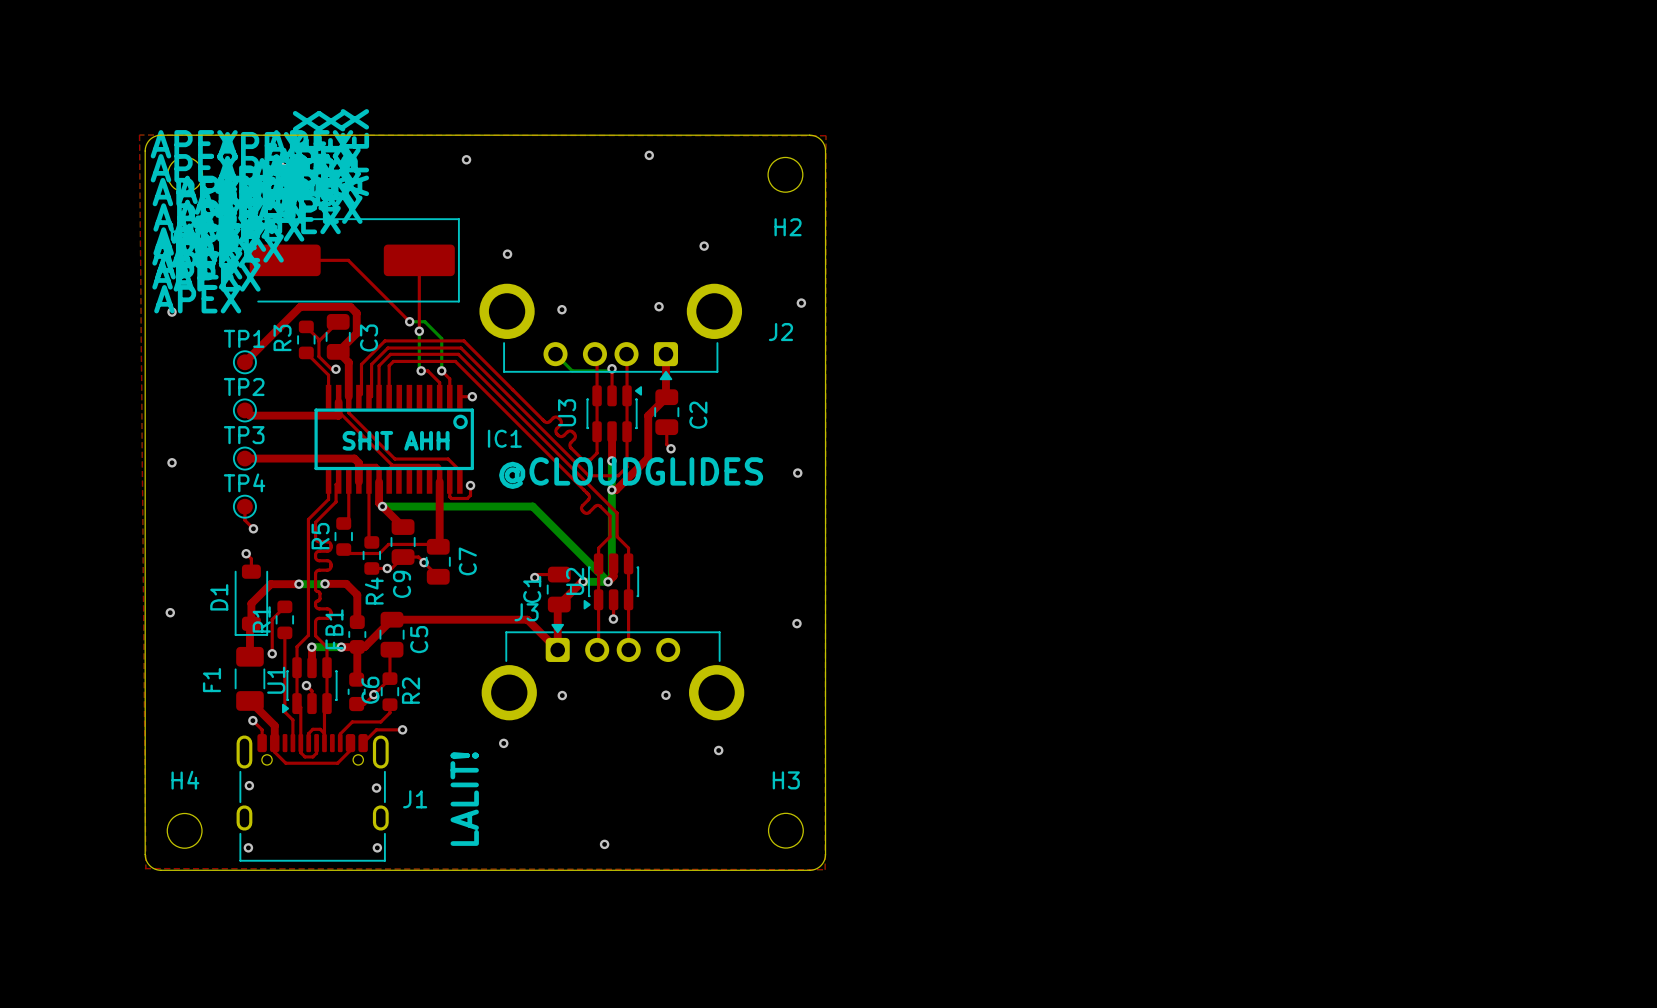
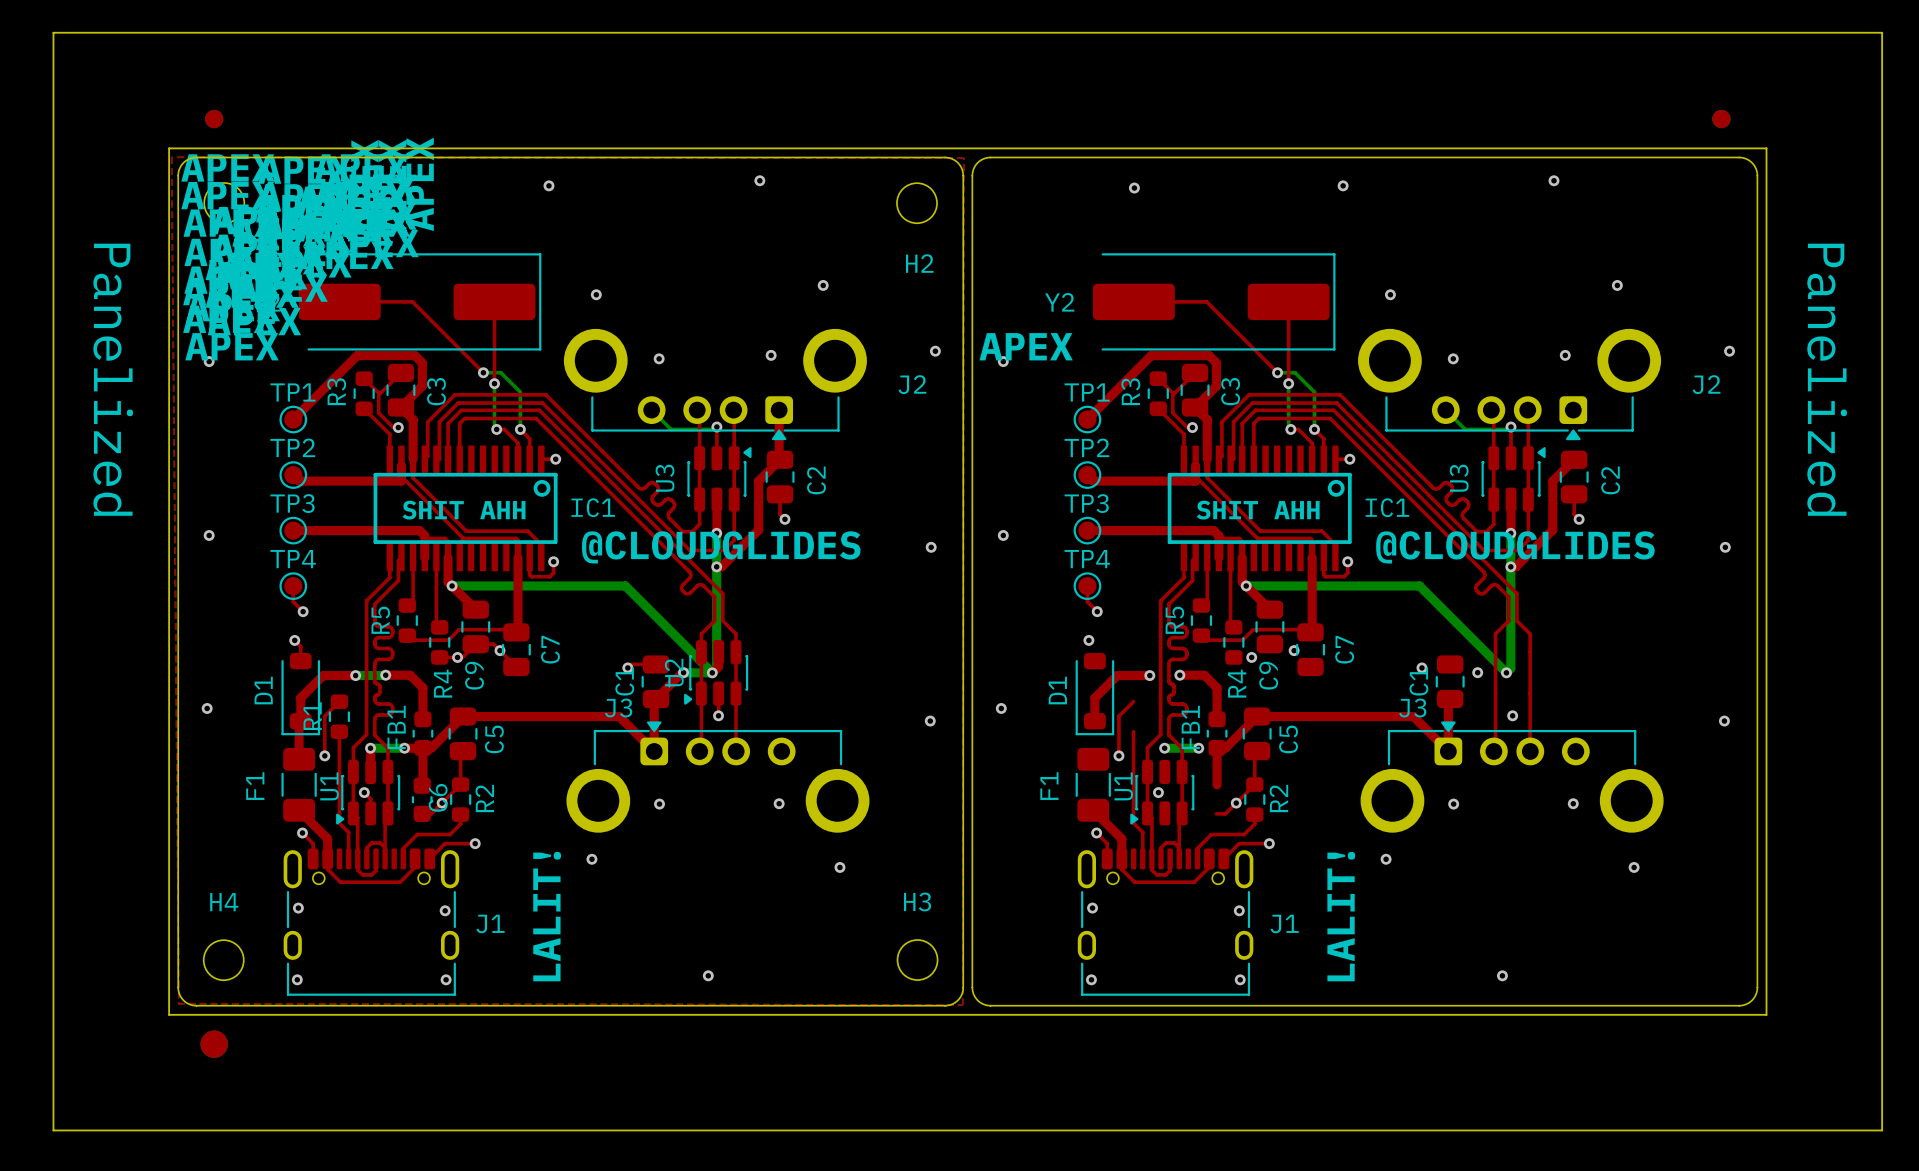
board edge: none -> (53, 32) (1882, 32) (1882, 1130) (53, 1130) (53, 32)
part: none -> (214, 119)
part: none -> (1721, 119)
board edge: none -> (169, 148) (1766, 148) (1766, 1014) (169, 1014) (169, 148)
board edge: none -> (990, 157) (1739, 157) (1752, 162) (1757, 175) (1757, 987) (1752, 1000) (1739, 1005) (990, 1005) (977, 1000) (972, 987) (972, 175) (977, 162) (990, 157)
via: none -> (1553, 180)
via: none -> (1343, 185)
via: none -> (1134, 188)
via: none -> (1617, 285)
via: none -> (1390, 294)
top track: none -> (1133, 301) (1206, 301) (1277, 372)
Y2: none -> (1214, 301)
top track: none -> (1288, 301) (1288, 383)
text: none -> APEX (1026, 346)
via: none -> (1729, 351)
via: none -> (1565, 355)
via: none -> (1453, 358)
via: none -> (1003, 361)
text: none -> Panelized (113, 379)
top track: none -> (1195, 372) (1172, 395)
bottom track: none -> (1277, 372) (1295, 372) (1314, 392) (1314, 429)
via: none -> (1277, 372)
text: none -> Panelized (1827, 379)
top track: none -> (1158, 378) (1172, 393) (1172, 412) (1187, 427) (1192, 427)
bottom track: none -> (1288, 383) (1288, 427) (1290, 429)
via: none -> (1288, 383)
J2: none -> (1509, 384)
C3: none -> (1195, 390)
R3: none -> (1158, 393)
top track: none -> (1158, 408) (1183, 434) (1183, 459)
bottom track: none -> (1445, 410) (1465, 429) (1508, 429) (1511, 427)
top track: none -> (1528, 410) (1528, 540) (1518, 550) (1484, 550) (1336, 403) (1252, 403) (1233, 421) (1233, 459) (1230, 459)
top track: none -> (1493, 412) (1493, 524) (1486, 531) (1476, 531) (1463, 517) (1462, 513) (1468, 505) (1465, 499) (1460, 499) (1453, 505) (1447, 501) (1446, 497) (1452, 489) (1449, 484) (1445, 482) (1437, 488) (1433, 488) (1340, 394) (1249, 394) (1221, 421) (1221, 456) (1218, 459)
top track: none -> (1087, 419) (1151, 355) (1209, 355) (1216, 362) (1216, 386) (1195, 407) (1207, 419) (1207, 477) (1260, 531) (1321, 531) (1335, 544) (1335, 557)
TP1: none -> (1087, 419)
top track: none -> (1511, 427) (1511, 458)
via: none -> (1511, 427)
via: none -> (1192, 427)
top track: none -> (1290, 429) (1298, 429) (1312, 443) (1312, 459)
via: none -> (1290, 429)
top track: none -> (1314, 429) (1323, 438) (1323, 459)
via: none -> (1314, 429)
top track: none -> (1195, 459) (1195, 476) (1257, 538) (1310, 538) (1312, 540) (1312, 630)
top track: none -> (1242, 459) (1242, 423) (1255, 410) (1333, 410) (1516, 593) (1516, 620) (1530, 634) (1530, 751)
top track: none -> (1253, 459) (1253, 423) (1258, 418) (1330, 418) (1484, 572) (1484, 577) (1476, 586) (1477, 591) (1483, 593) (1495, 584) (1508, 596) (1508, 620) (1495, 634) (1495, 749)
top track: none -> (1335, 459) (1349, 459)
via: none -> (1349, 459)
top track: none -> (1574, 459) (1552, 481) (1552, 529) (1515, 566) (1510, 566)
top track: none -> (1195, 465) (1195, 481) (1093, 481) (1087, 475)
TP2: none -> (1087, 475)
C2: none -> (1574, 477)
U3: none -> (1513, 478)
top track: none -> (1574, 494) (1574, 514) (1579, 519)
top track: none -> (1511, 499) (1511, 533)
IC1: none -> (1259, 508)
text: none -> SHIT AHH (1258, 510)
via: none -> (1579, 519)
top track: none -> (1087, 530) (1213, 530) (1218, 535) (1218, 557) (1218, 540) (1220, 538) (1239, 538) (1242, 541) (1242, 581) (1269, 609)
TP3: none -> (1087, 530)
bottom track: none -> (1510, 533) (1510, 668) (1506, 672) (1419, 585) (1246, 585)
via: none -> (1510, 533)
via: none -> (1003, 535)
text: none -> @CLOUDGLIDES (1515, 547)
via: none -> (1725, 547)
top track: none -> (1183, 557) (1183, 577) (1160, 600) (1160, 734) (1147, 747) (1147, 813) (1151, 817) (1151, 870) (1156, 874) (1165, 874) (1170, 870) (1170, 858)
top track: none -> (1195, 557) (1192, 560) (1192, 580) (1168, 604) (1169, 624) (1183, 626) (1186, 630) (1184, 636) (1171, 637) (1168, 641) (1170, 647) (1183, 648) (1186, 652) (1184, 658) (1171, 659) (1168, 663) (1169, 682) (1174, 686) (1173, 693) (1169, 696) (1169, 701) (1172, 703) (1183, 704) (1186, 707) (1184, 714) (1171, 715) (1168, 719) (1168, 735) (1182, 748) (1182, 813)
top track: none -> (1207, 557) (1207, 599) (1201, 605)
top track: none -> (1230, 557) (1230, 624)
top track: none -> (1323, 557) (1323, 574) (1325, 576) (1344, 576) (1347, 573) (1347, 561)
via: none -> (1347, 561)
via: none -> (1510, 566)
top track: none -> (1087, 586) (1087, 601) (1097, 611)
TP4: none -> (1087, 586)
via: none -> (1246, 585)
via: none -> (1097, 611)
R5: none -> (1201, 620)
C9: none -> (1269, 626)
top track: none -> (1307, 629) (1253, 629) (1242, 640) (1205, 640)
via: none -> (1088, 640)
R4: none -> (1233, 642)
C7: none -> (1310, 649)
via: none -> (1294, 650)
via: none -> (1251, 657)
via: none -> (1421, 667)
via: none -> (1477, 672)
via: none -> (1506, 672)
top track: none -> (1179, 675) (1204, 675) (1217, 687) (1217, 719)
via: none -> (1179, 675)
top track: none -> (1149, 675) (1117, 675) (1094, 697) (1094, 721)
via: none -> (1149, 675)
C1: none -> (1450, 681)
D1: none -> (1094, 694)
top track: none -> (1133, 701) (1118, 716) (1118, 755)
top track: none -> (1448, 700) (1448, 751) (1413, 716) (1257, 716) (1225, 748) (1217, 748) (1217, 784)
via: none -> (1001, 708)
via: none -> (1512, 715)
via: none -> (1724, 721)
top track: none -> (1133, 731) (1133, 823) (1142, 832) (1142, 858)
FB1: none -> (1217, 733)
C5: none -> (1257, 733)
bottom track: none -> (1164, 748) (1198, 748)
via: none -> (1164, 748)
via: none -> (1198, 748)
top track: none -> (1257, 751) (1254, 753) (1254, 784) (1225, 813) (1216, 813)
via: none -> (1118, 755)
J3: none -> (1512, 777)
F1: none -> (1093, 784)
via: none -> (1158, 792)
U1: none -> (1162, 792)
R2: none -> (1254, 799)
via: none -> (1236, 803)
via: none -> (1453, 804)
via: none -> (1573, 803)
top track: none -> (1093, 810) (1121, 838) (1121, 869) (1134, 882) (1194, 882) (1209, 867)
top track: none -> (1254, 814) (1254, 823) (1244, 834) (1211, 834) (1197, 848) (1197, 858)
top track: none -> (1179, 816) (1179, 858)
top track: none -> (1096, 833) (1107, 843) (1107, 858)
via: none -> (1096, 833)
top track: none -> (1269, 843) (1239, 843) (1223, 858)
via: none -> (1269, 843)
top track: none -> (1179, 847) (1174, 843) (1165, 843) (1161, 847) (1161, 858)
via: none -> (1386, 859)
via: none -> (1634, 867)
via: none -> (1092, 908)
via: none -> (1239, 910)
J1: none -> (1165, 922)
text: none -> LALIT! (1341, 916)
via: none -> (1502, 975)
via: none -> (1091, 979)
via: none -> (1240, 979)
part: none -> (214, 1044)

